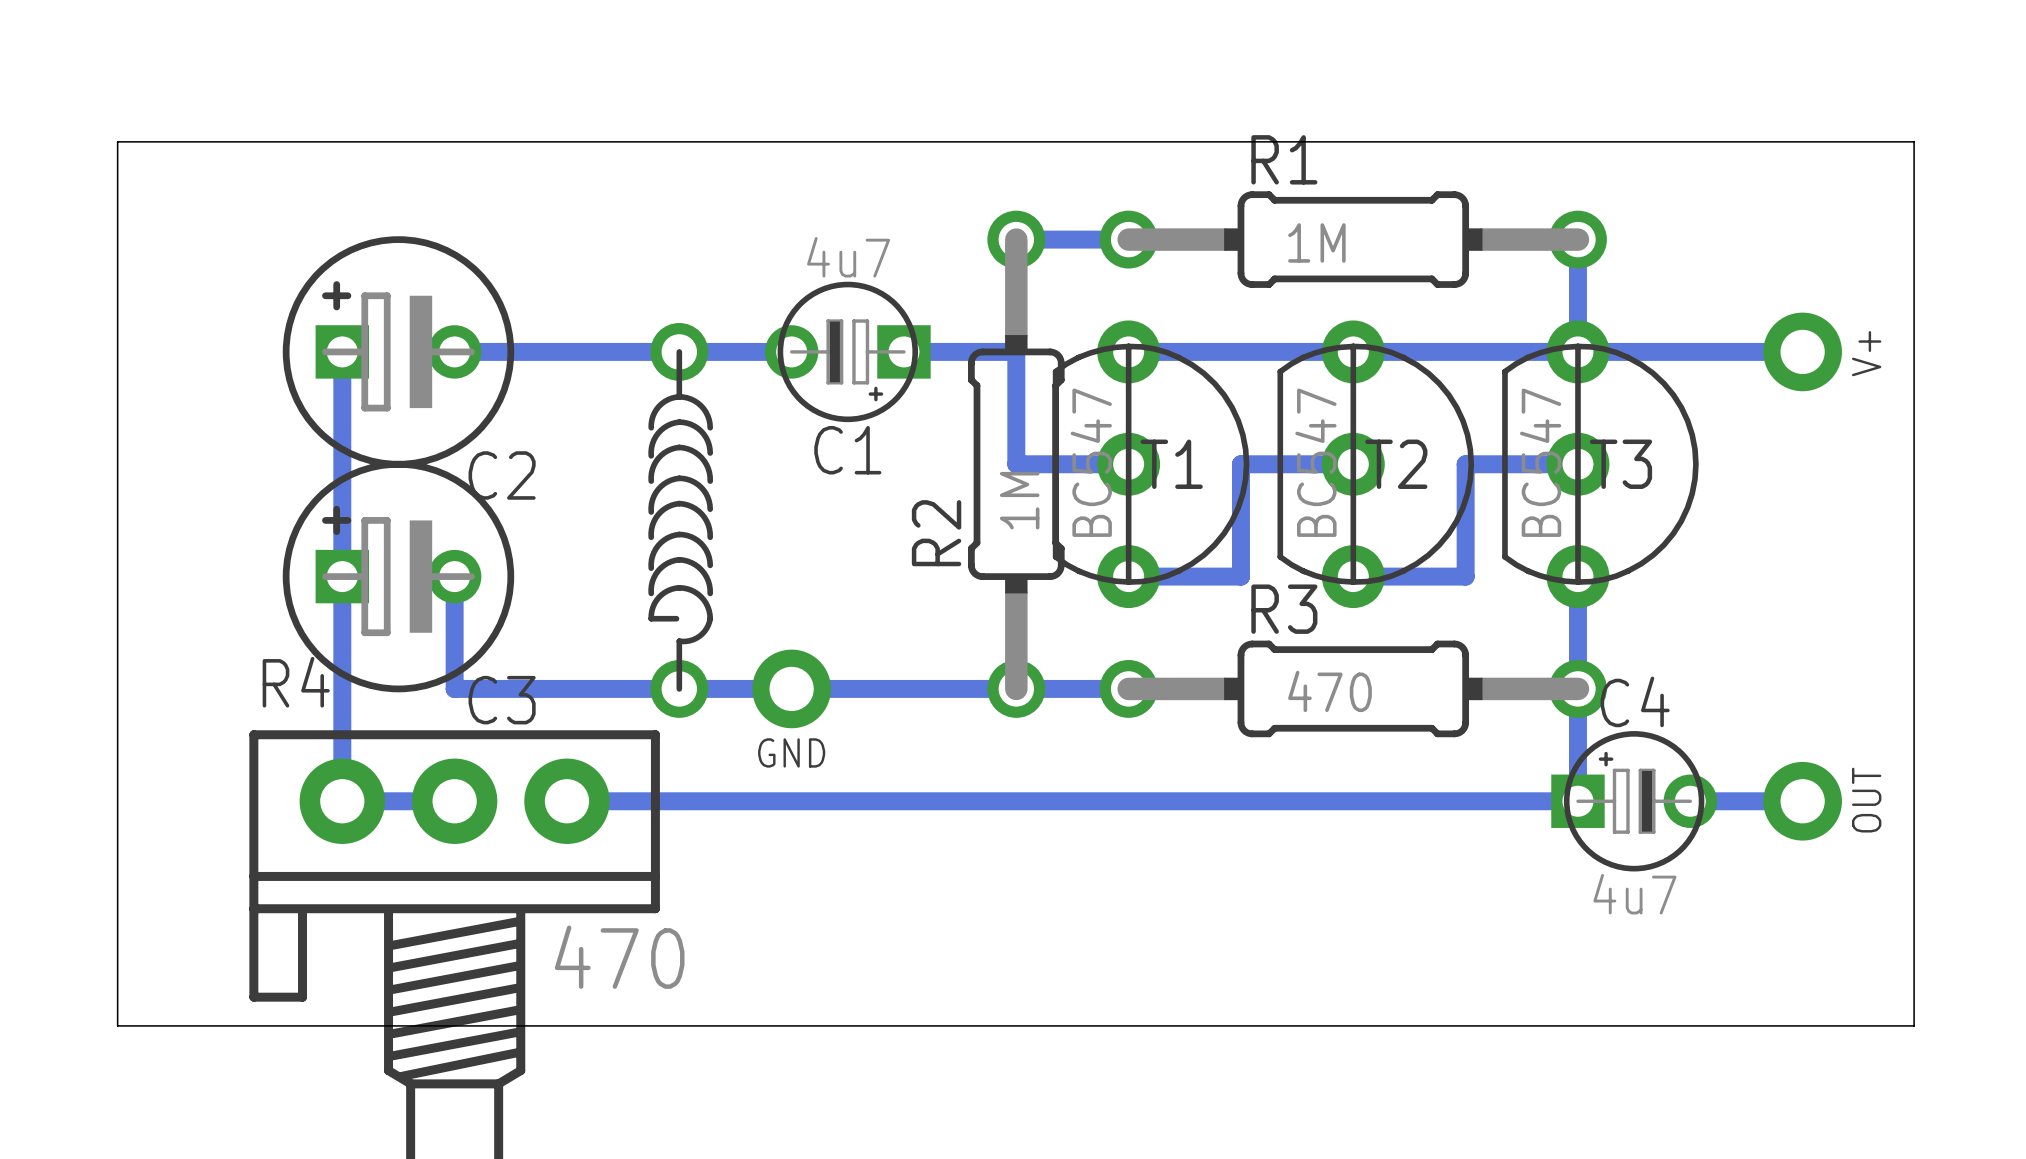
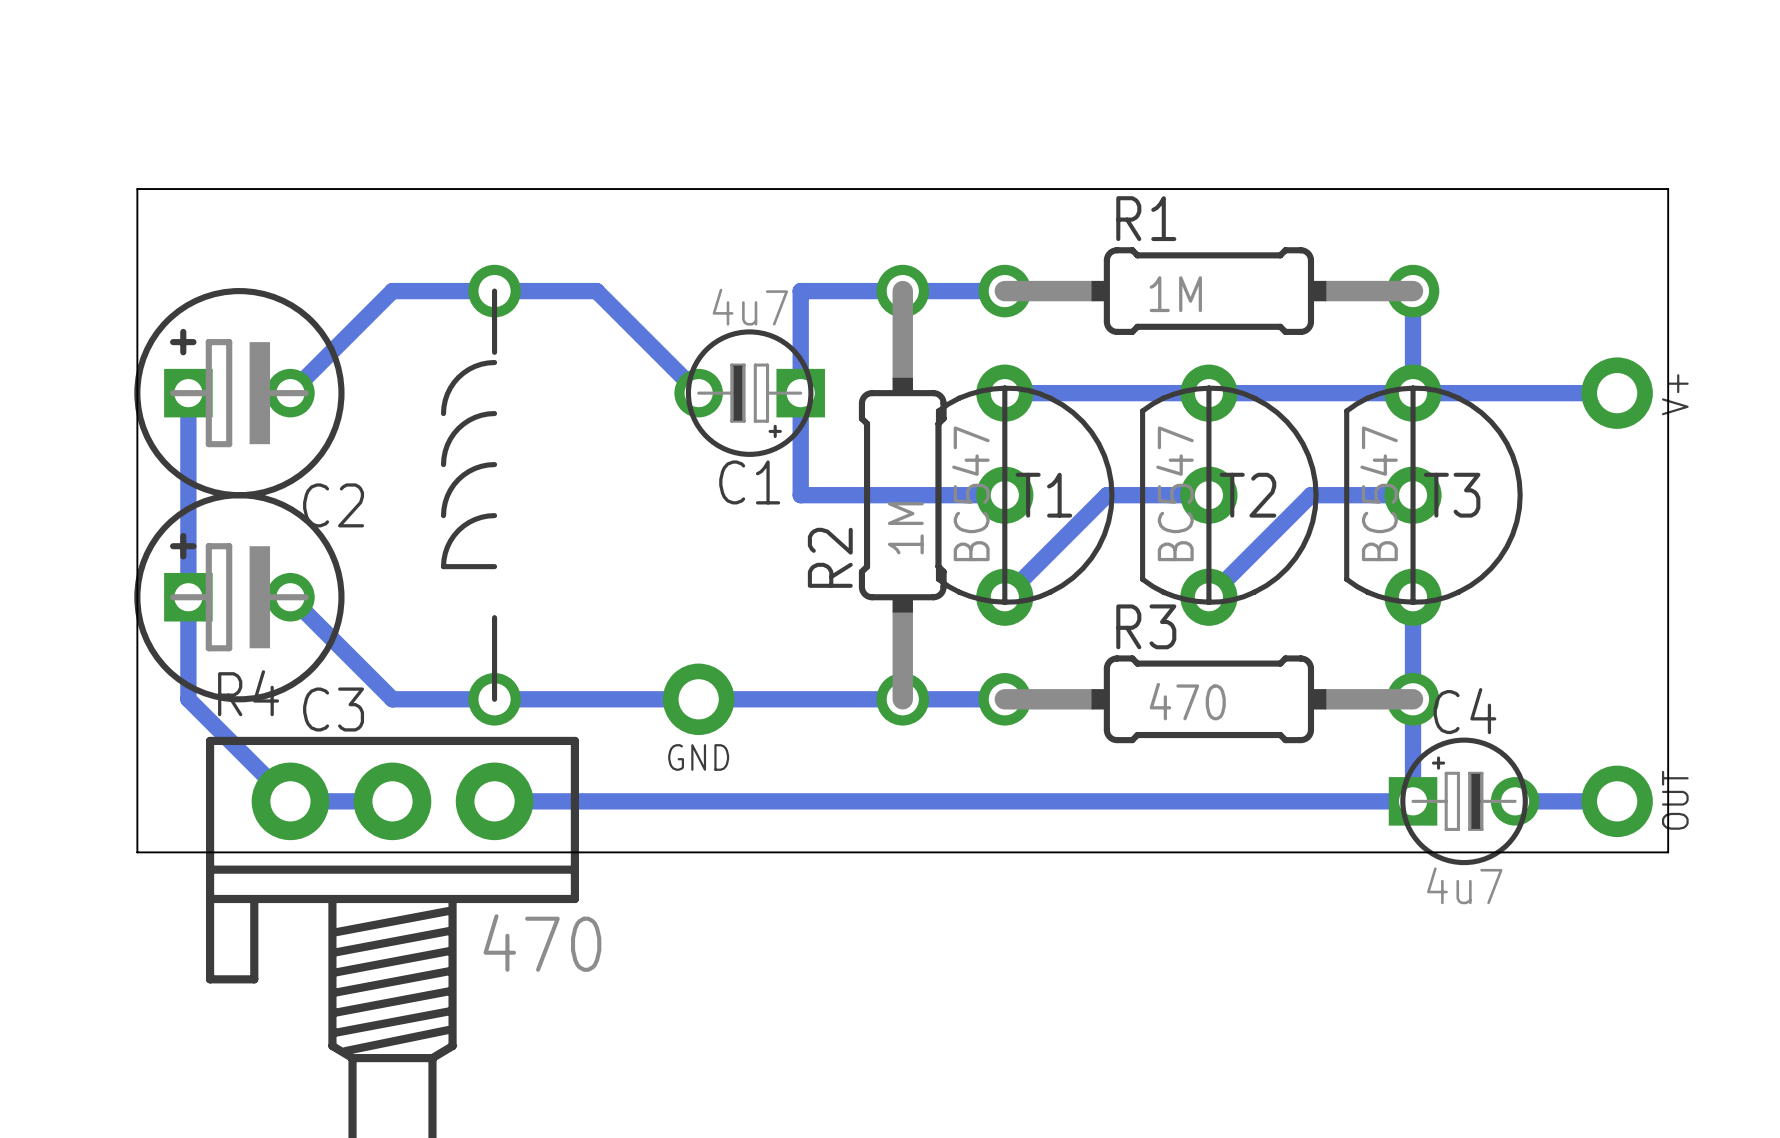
board edge: (117, 141) (1914, 141) (1914, 1025) (117, 1025) (117, 141) -> (137, 189) (137, 852) (1668, 852) (1668, 189) (137, 189)
bottom track: (1016, 239) (1016, 464) -> (902, 291) (800, 291) (800, 495) (902, 495)
bottom track: (342, 351) (342, 801) -> (188, 393) (188, 699) (290, 801)
C2 position: (398, 351) -> (239, 393)
bottom track: (454, 351) (791, 351) -> (290, 393) (392, 291) (596, 291) (698, 393)
bottom track: (903, 351) (1016, 351) -> none
part: none -> (480, 495)
bottom track: (1240, 464) (1240, 576) (1128, 576) -> (1106, 495) (1004, 597)
bottom track: (1465, 464) (1465, 576) (1353, 576) -> (1310, 495) (1208, 597)
part: (680, 520) -> none
C3 position: (398, 576) -> (239, 597)
bottom track: (454, 576) (454, 688) -> (290, 597) (392, 699)

